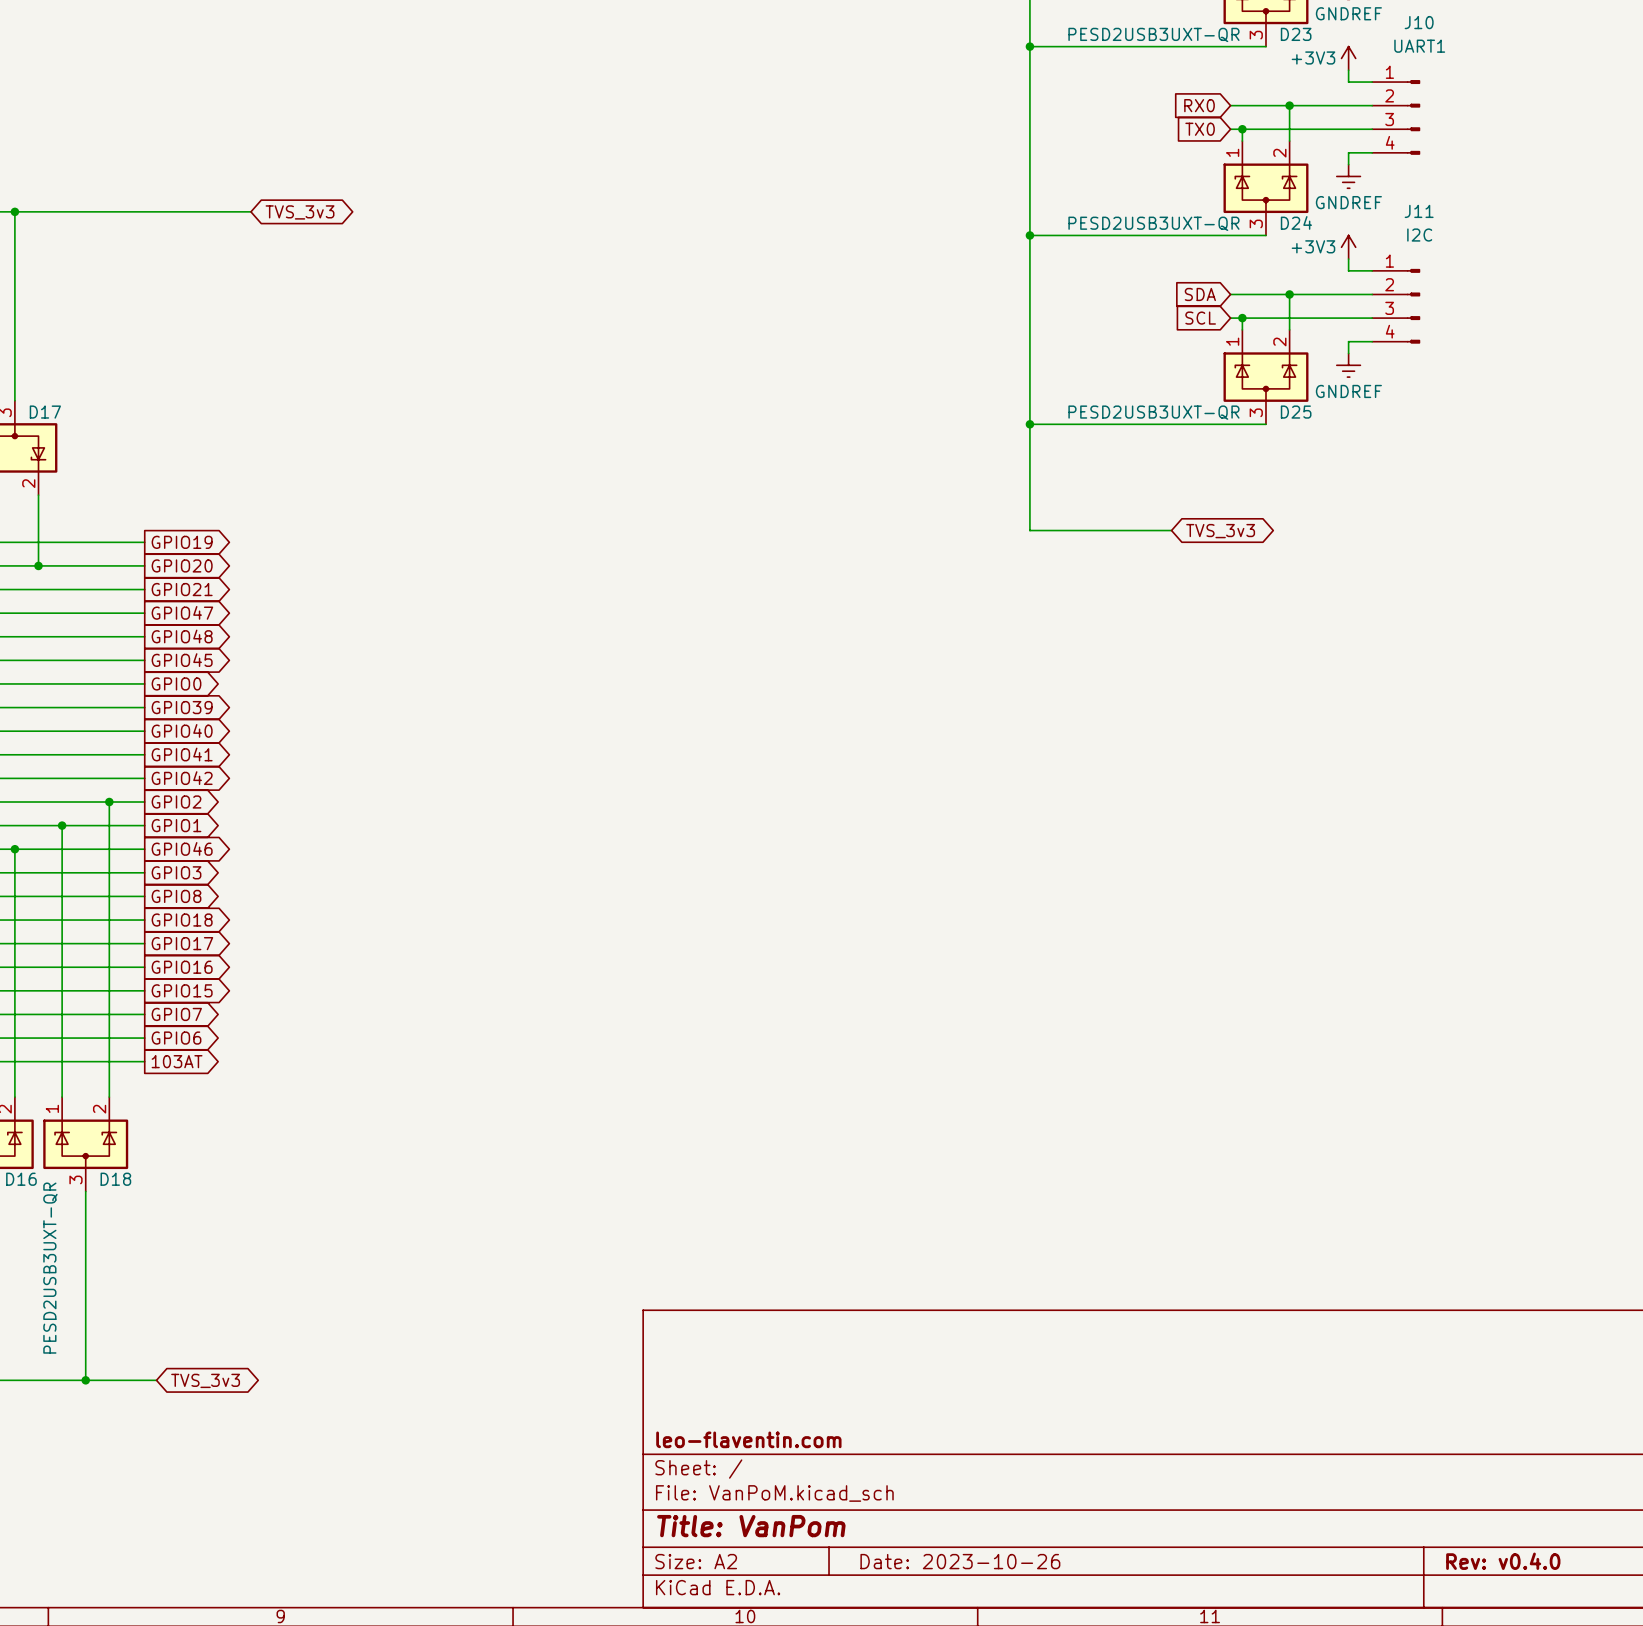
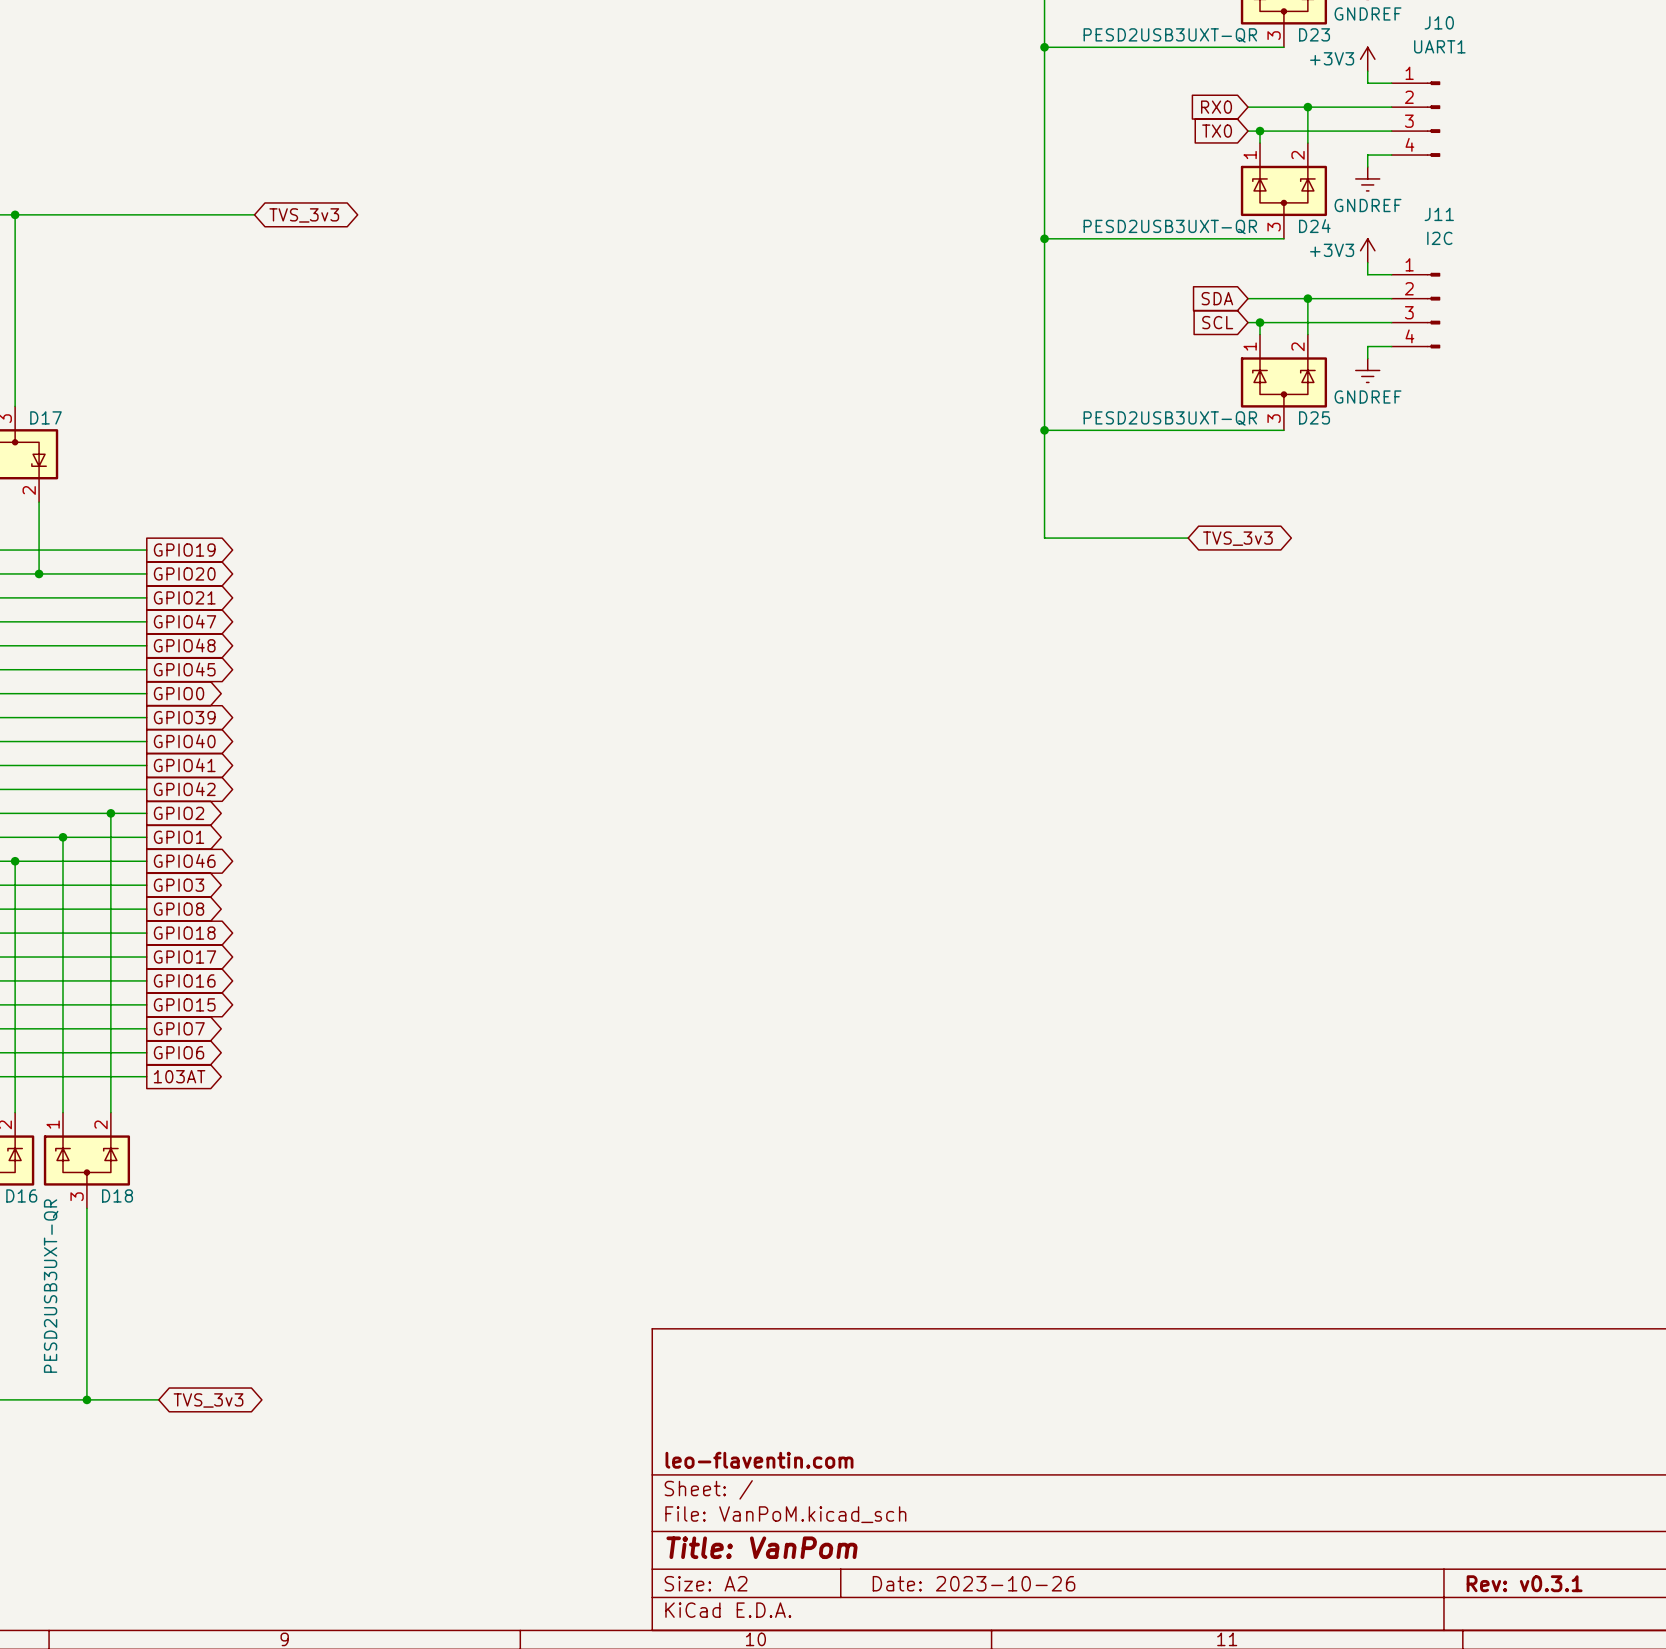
title block: Rev: v0.4.0 (1503, 1561) -> Rev: v0.3.1 (1524, 1583)

